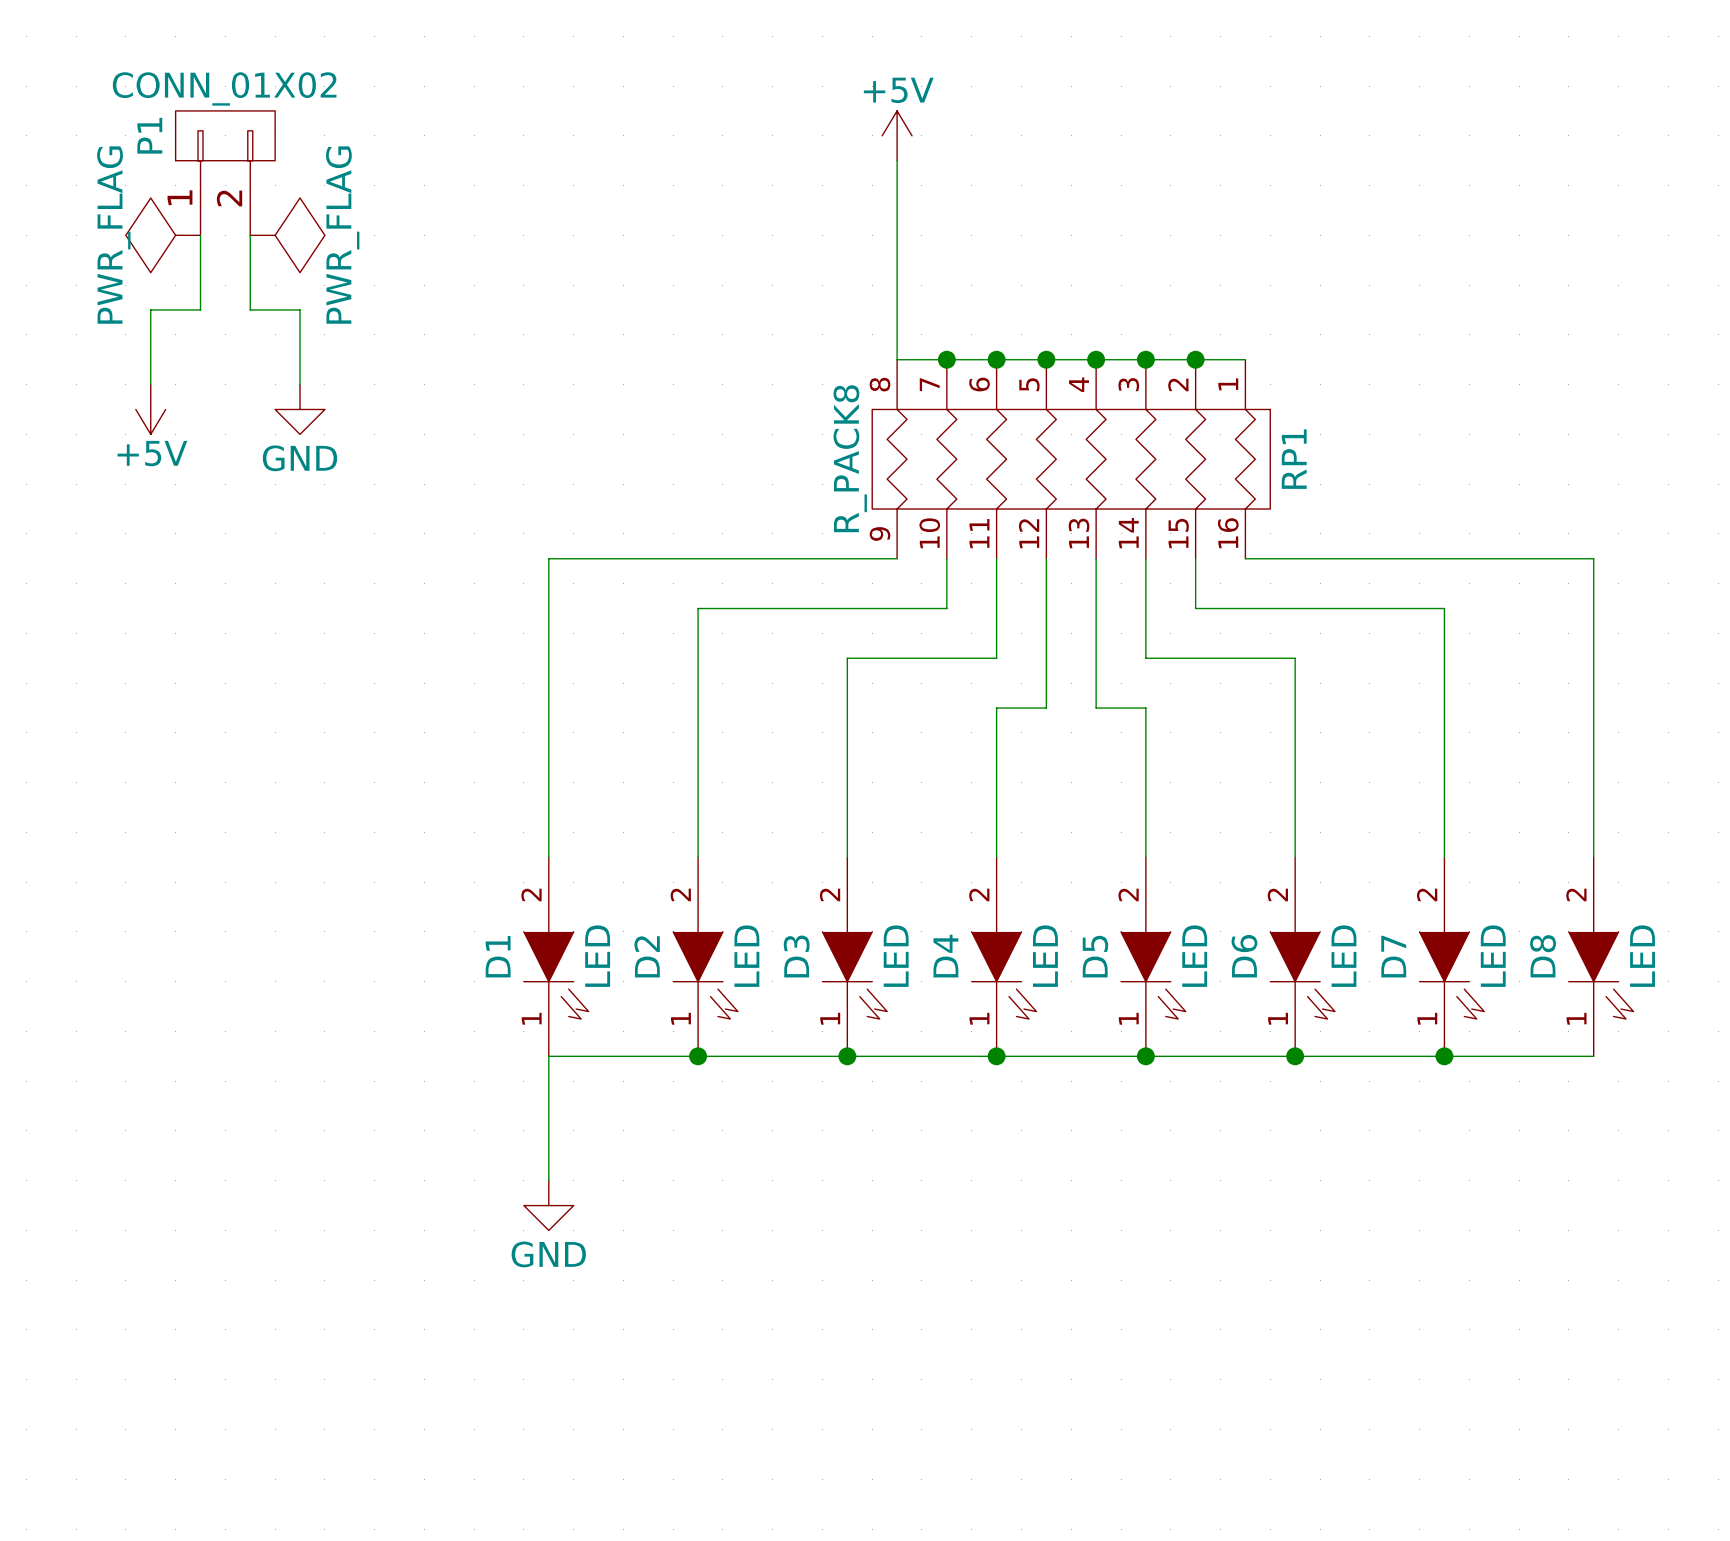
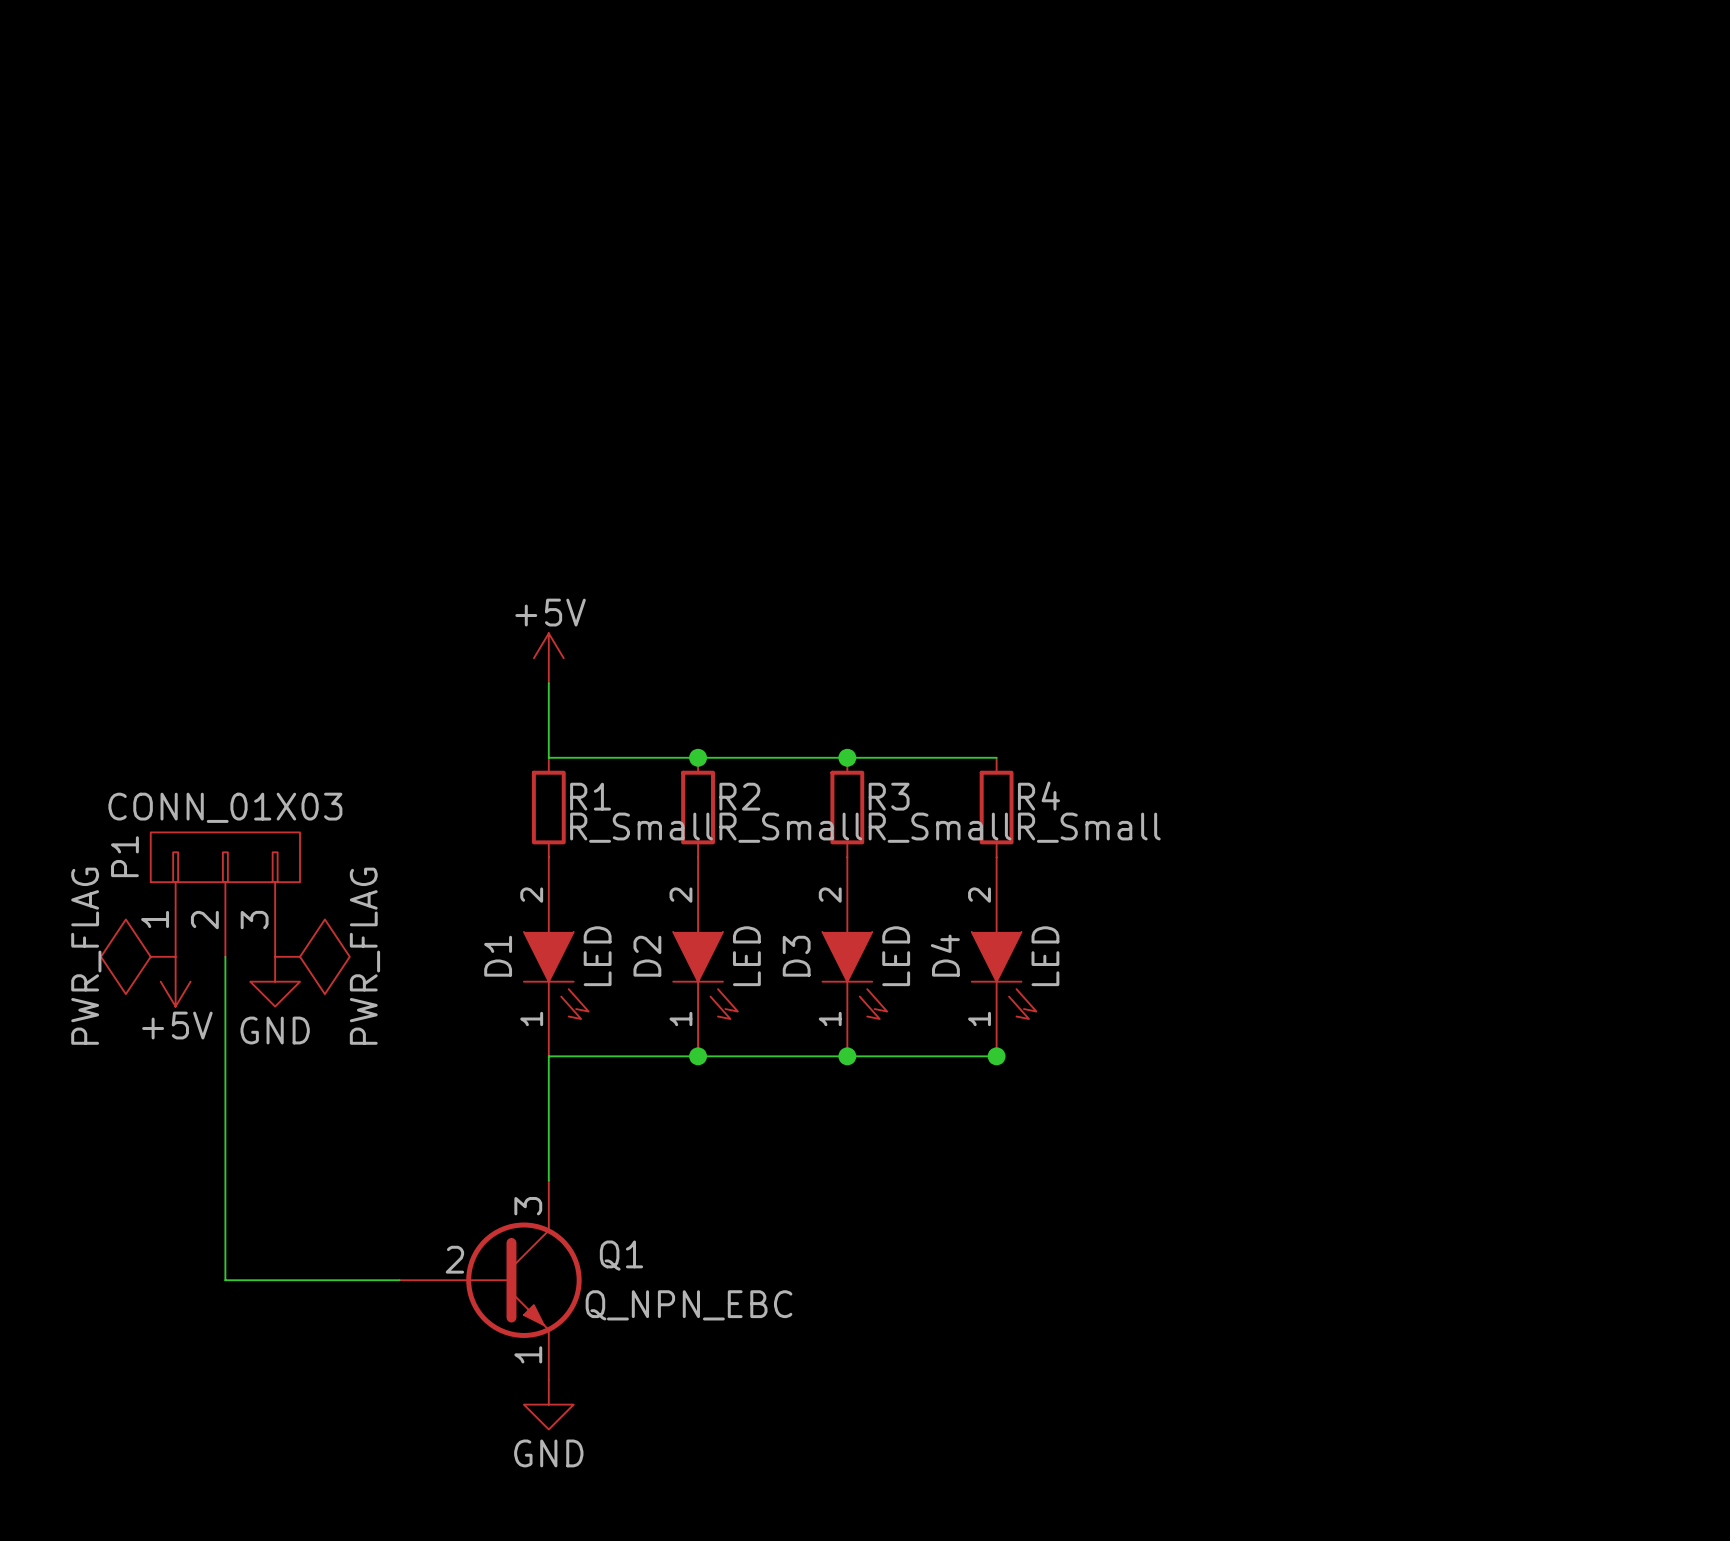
P1 value: CONN_01X02 (224, 88) -> CONN_01X03 (225, 807)
P1 symbol: [175, 110, 276, 236] -> [150, 832, 301, 957]
power symbol: +5V (897, 135) -> none
wire: (897, 160) (897, 359) (1245, 359) -> none
power symbol: PWR_FLAG (163, 235) -> none
wire: (200, 235) (200, 309) (150, 309) (150, 384) -> none
wire: (250, 235) (250, 309) (300, 309) (300, 384) -> none
power symbol: PWR_FLAG (287, 235) -> none
junction: (946, 359) -> none
junction: (996, 359) -> none
junction: (1046, 359) -> none
junction: (1096, 359) -> none
junction: (1145, 359) -> none
junction: (1195, 359) -> none
power symbol: +5V (150, 409) -> none
power symbol: GND (300, 409) -> none
RP1: R_PACK8 (1071, 459) -> none
wire: (897, 558) (548, 558) (548, 683) -> none
wire: (946, 558) (946, 608) (698, 608) (698, 857) -> none
wire: (996, 558) (996, 658) (847, 658) (847, 857) -> none
wire: (1046, 558) (1046, 708) (996, 708) (996, 857) -> none
wire: (1096, 558) (1096, 708) (1145, 708) (1145, 857) -> none
wire: (1145, 558) (1145, 658) (1295, 658) (1295, 857) -> none
wire: (1195, 558) (1195, 608) (1444, 608) (1444, 857) -> none
wire: (1245, 558) (1593, 558) (1593, 857) -> none
power symbol: none -> +5V (548, 658)
wire: (548, 757) (548, 857) -> (548, 757) (996, 757)
junction: none -> (698, 757)
junction: none -> (847, 757)
R1: none -> R_Small (548, 807)
R2: none -> R_Small (698, 807)
R3: none -> R_Small (847, 807)
R4: none -> R_Small (996, 807)
power symbol: none -> PWR_FLAG (138, 956)
wire: none -> (225, 956) (225, 1280) (399, 1280)
power symbol: none -> PWR_FLAG (312, 956)
D5: LED (1153, 956) -> none
D6: LED (1302, 956) -> none
D7: LED (1451, 956) -> none
D8: LED (1601, 956) -> none
power symbol: none -> +5V (175, 981)
power symbol: none -> GND (275, 981)
wire: (996, 1056) (1593, 1056) -> none
junction: (1145, 1056) -> none
junction: (1295, 1056) -> none
junction: (1444, 1056) -> none
power symbol: GND (548, 1205) -> none
Q1: none -> Q_NPN_EBC (490, 1280)
power symbol: none -> GND (548, 1404)

